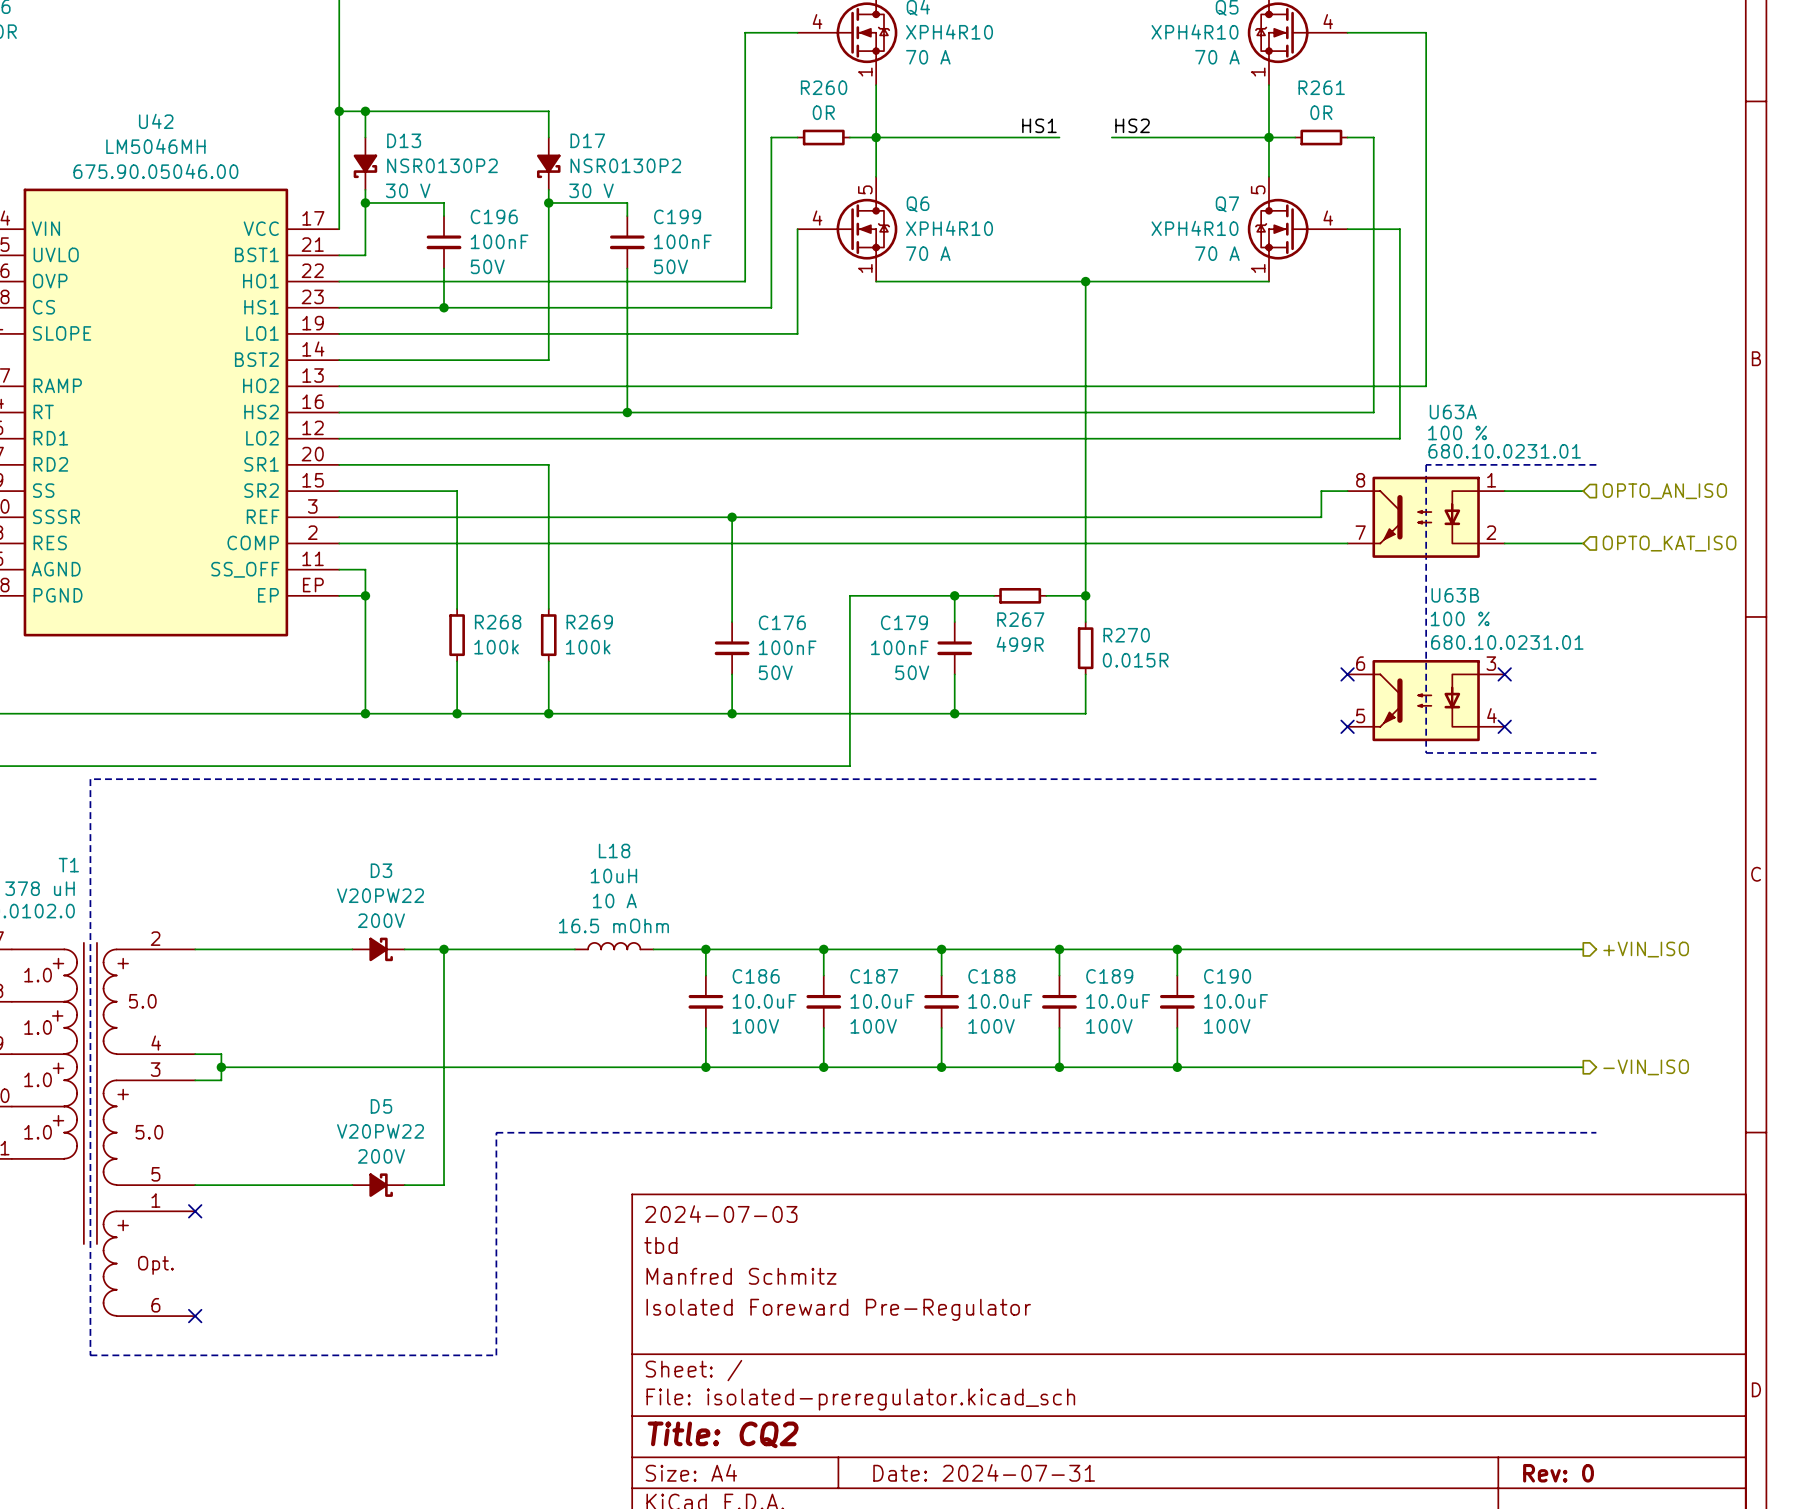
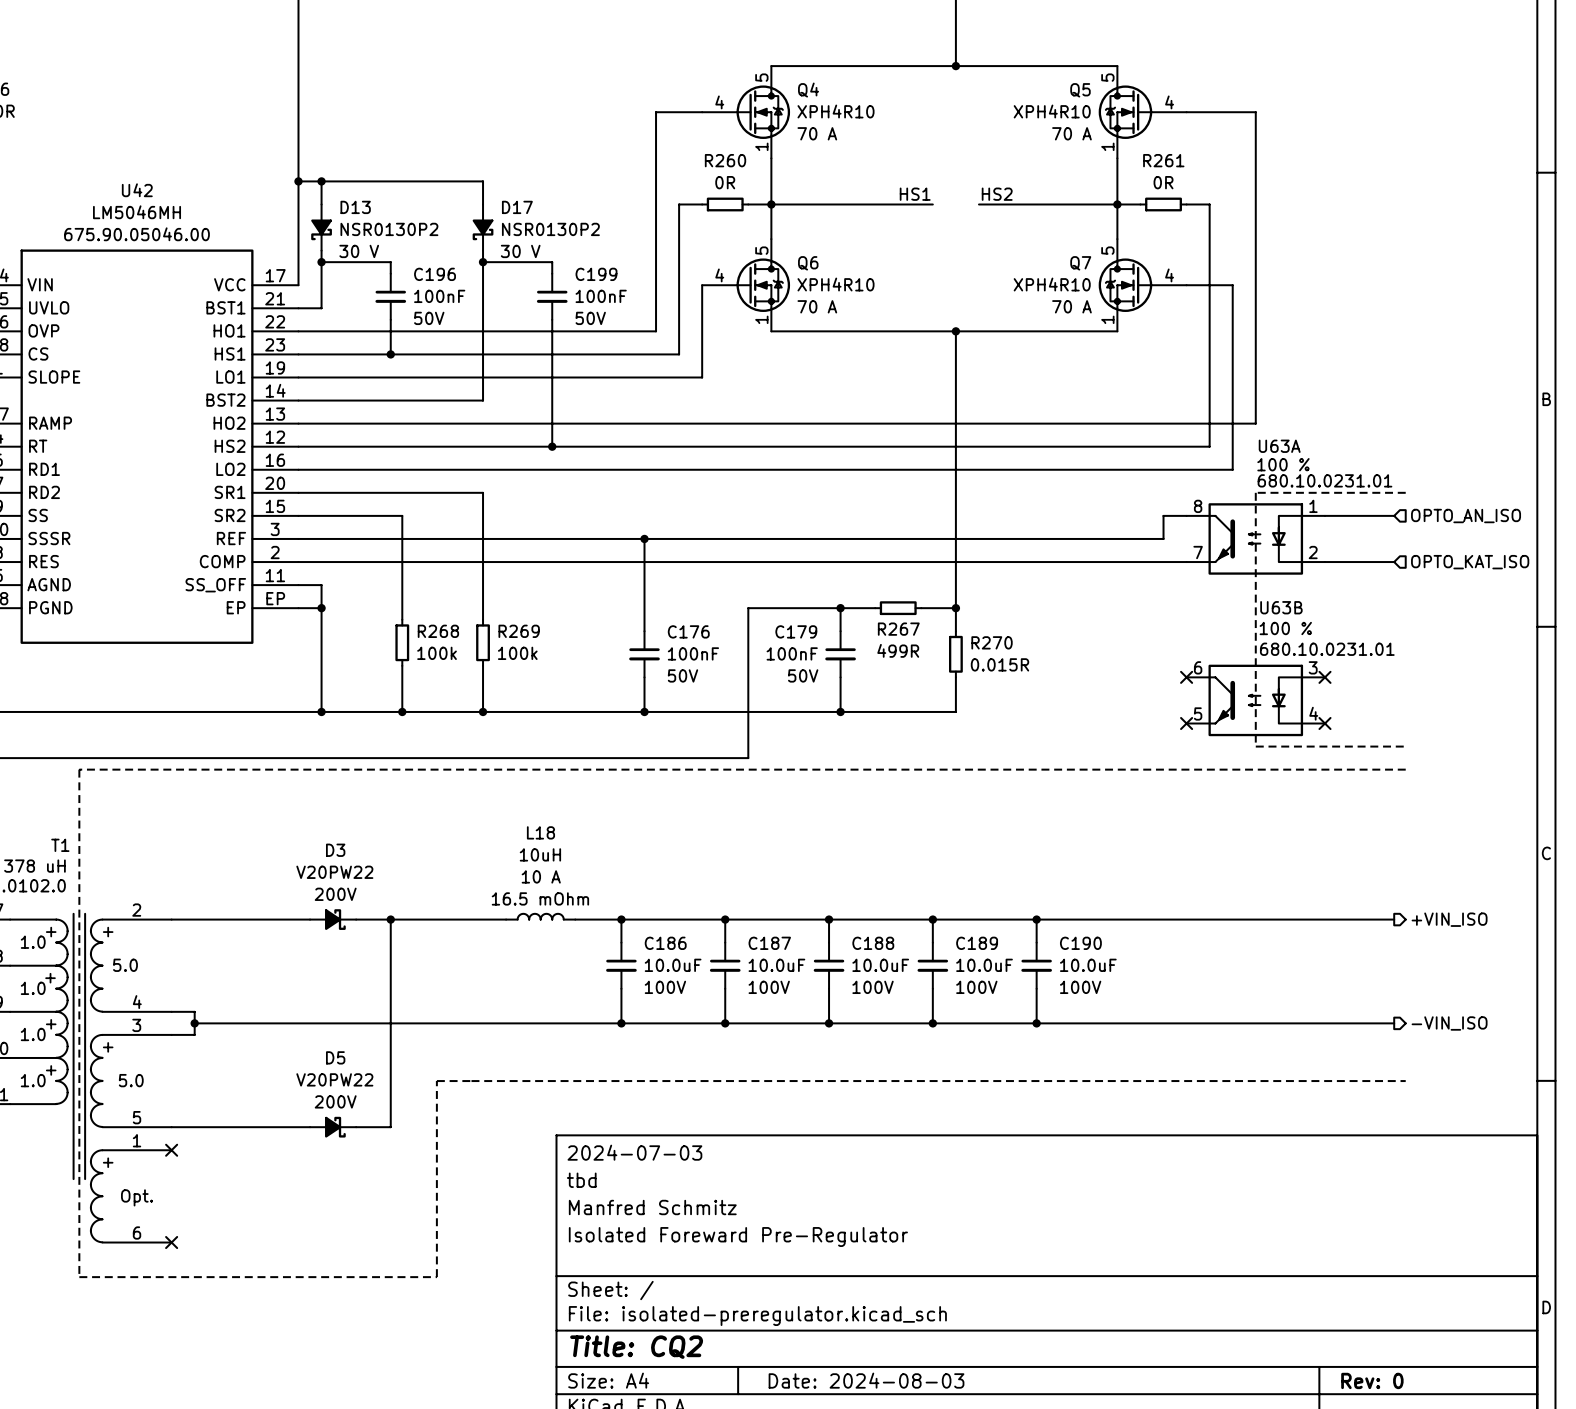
U42 pin number: 16 (313, 401) -> 12 (275, 437)
U42 pin number: 12 (313, 427) -> 16 (275, 460)
title block: Date: 2024-07-31 (984, 1472) -> Date: 2024-08-03 (866, 1380)

